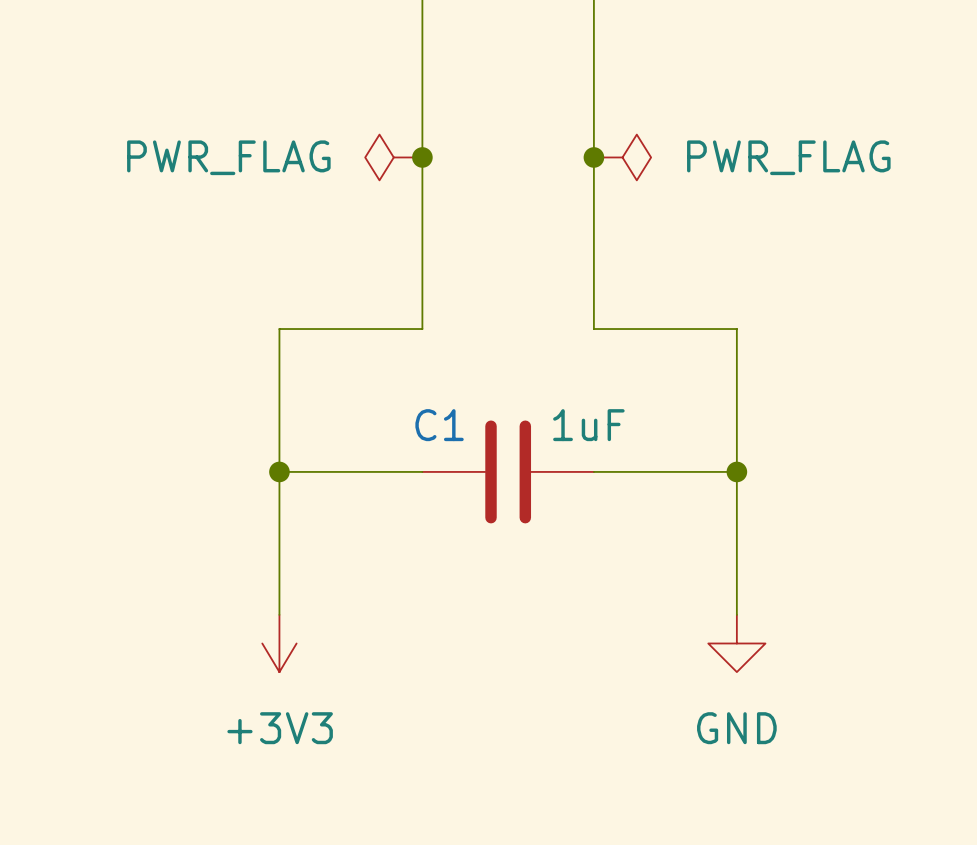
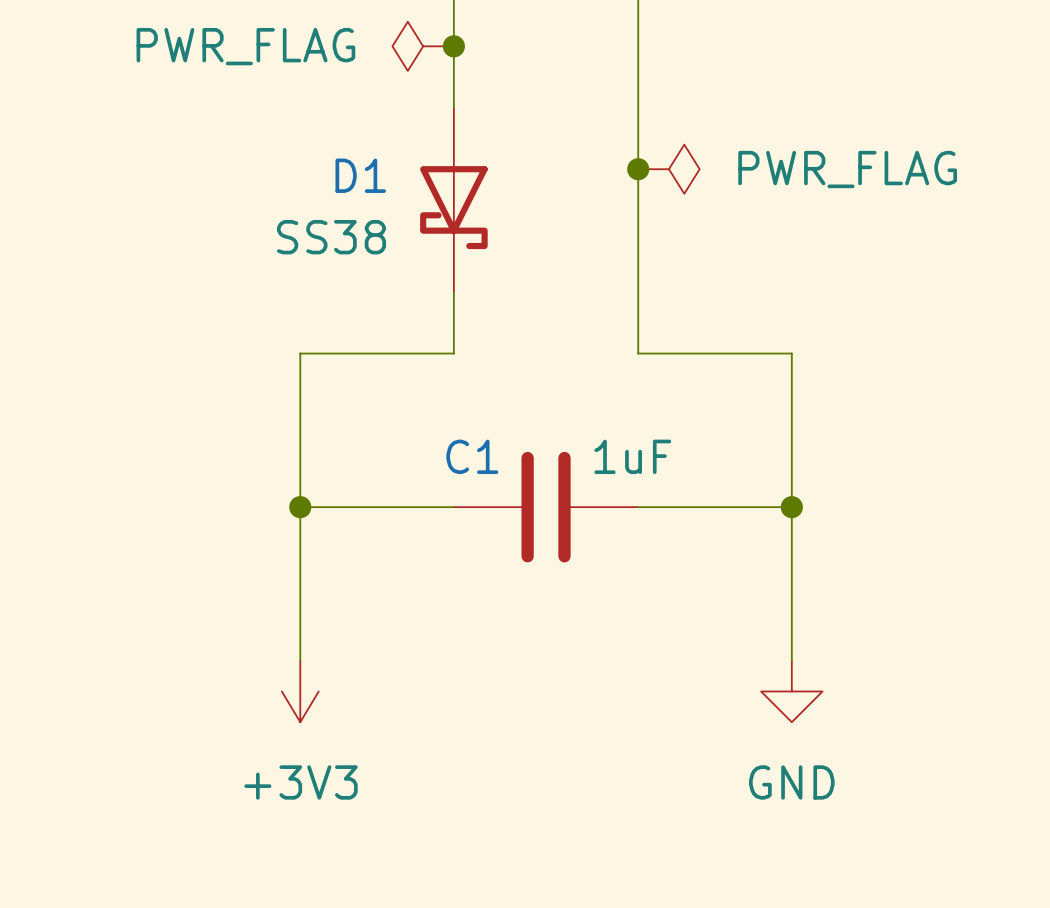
power symbol position: PWR_FLAG (393, 157) -> PWR_FLAG (423, 46)
junction position: (422, 157) -> (453, 46)
D1: none -> SS38 (453, 199)

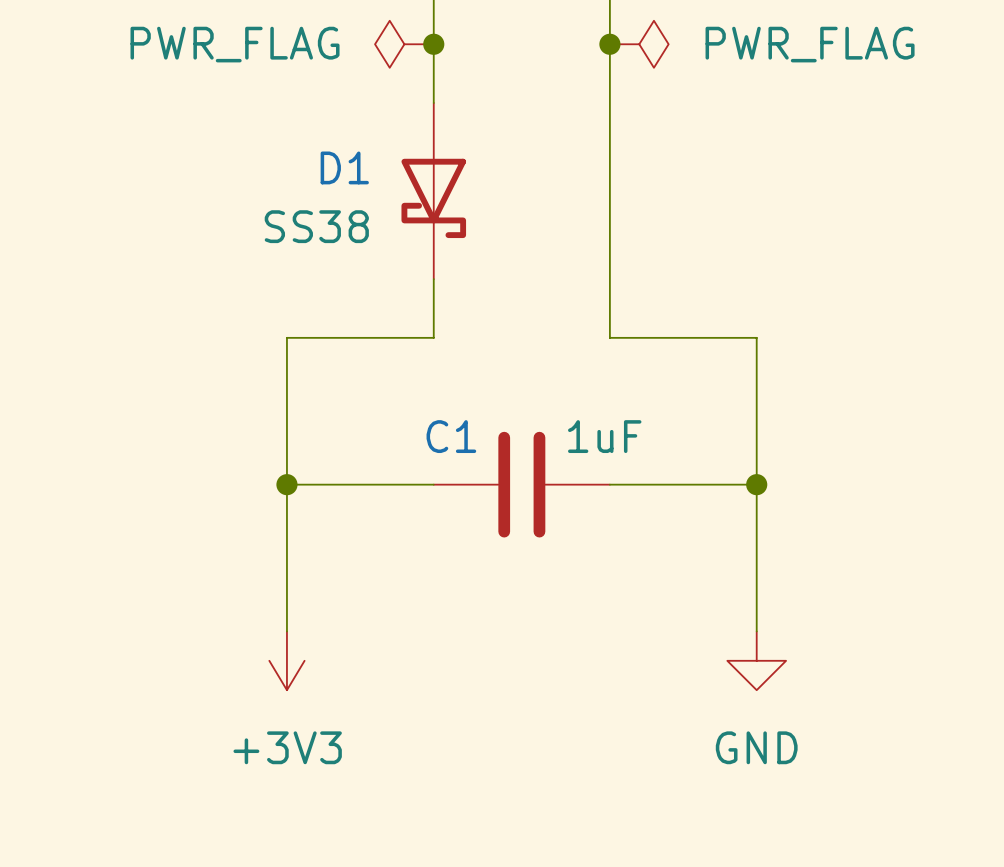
junction position: (638, 169) -> (609, 44)
power symbol position: PWR_FLAG (668, 169) -> PWR_FLAG (639, 44)

